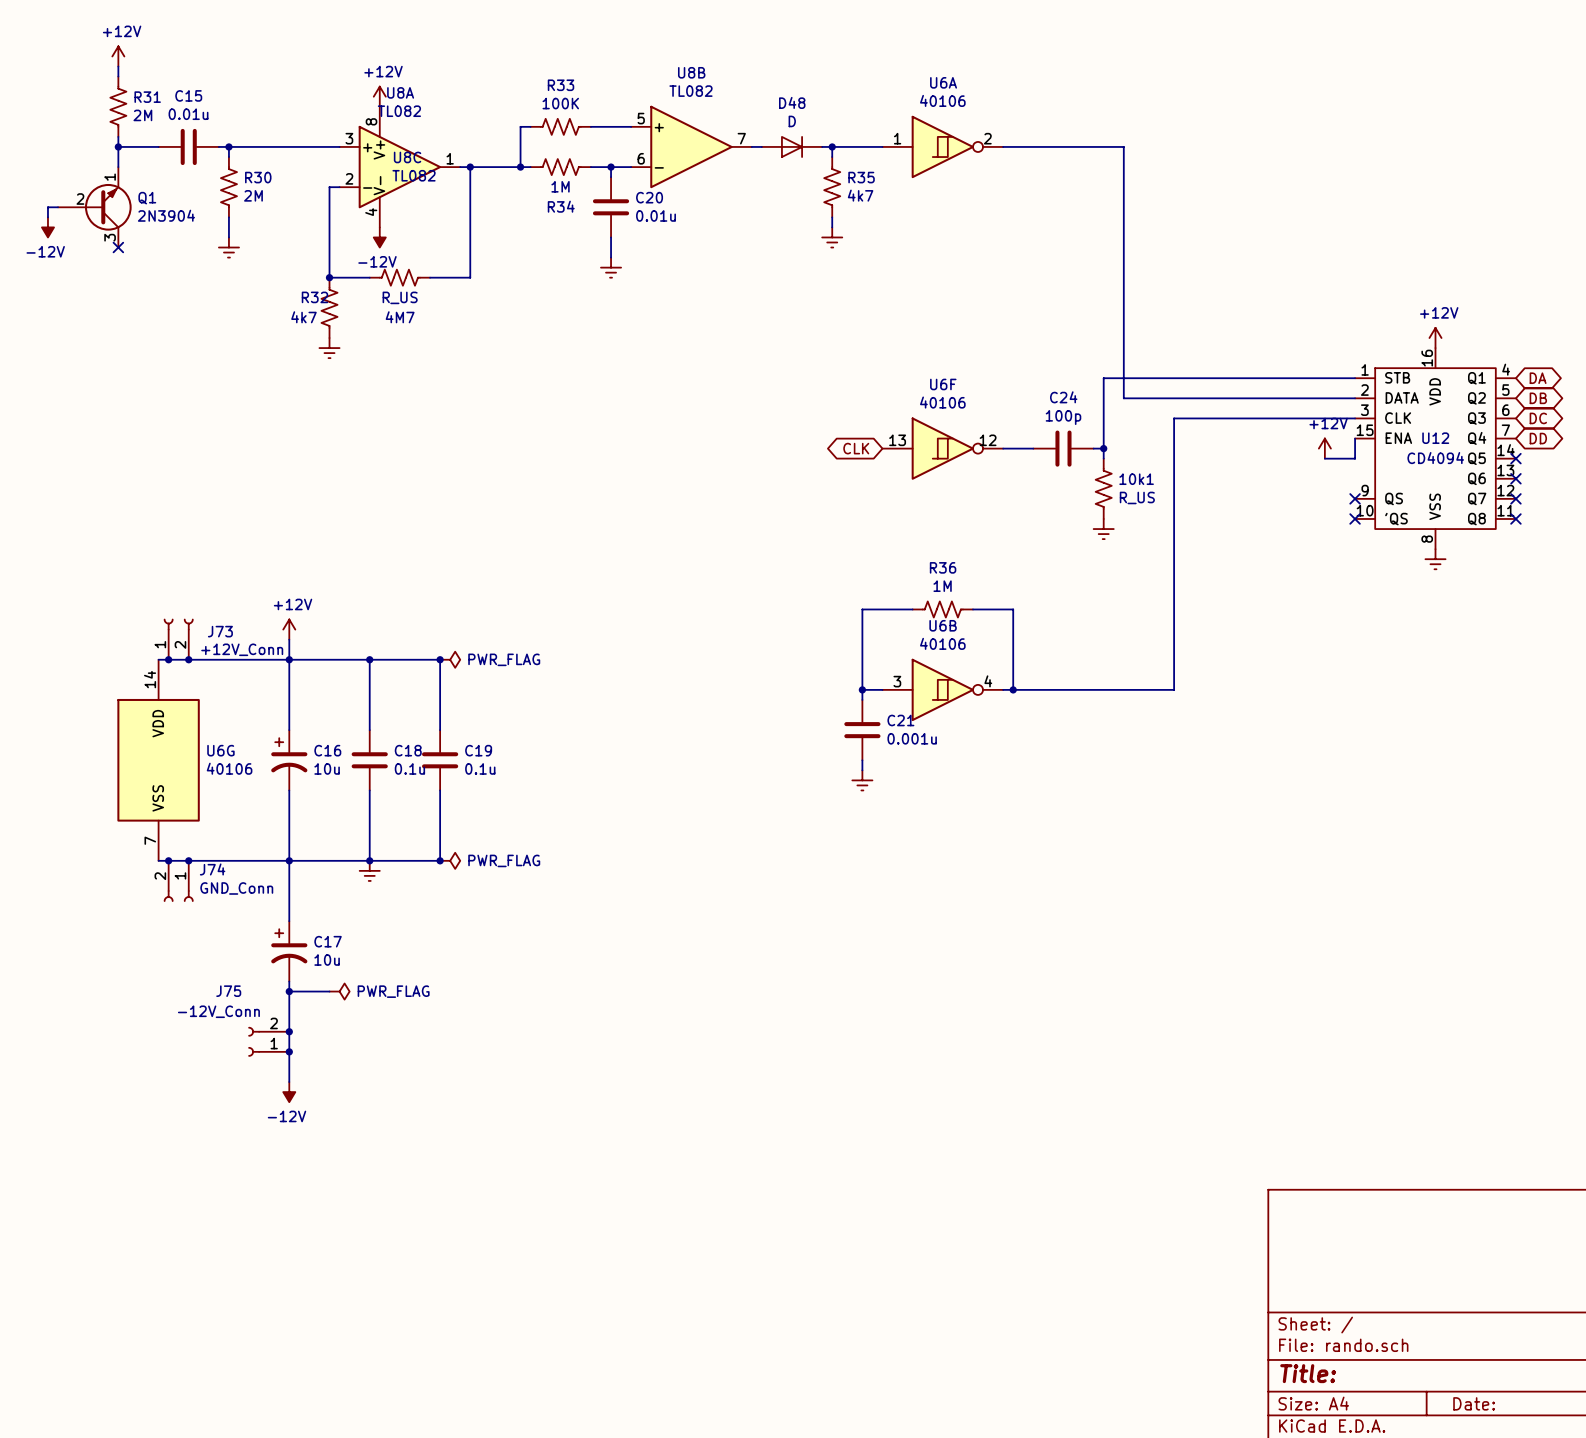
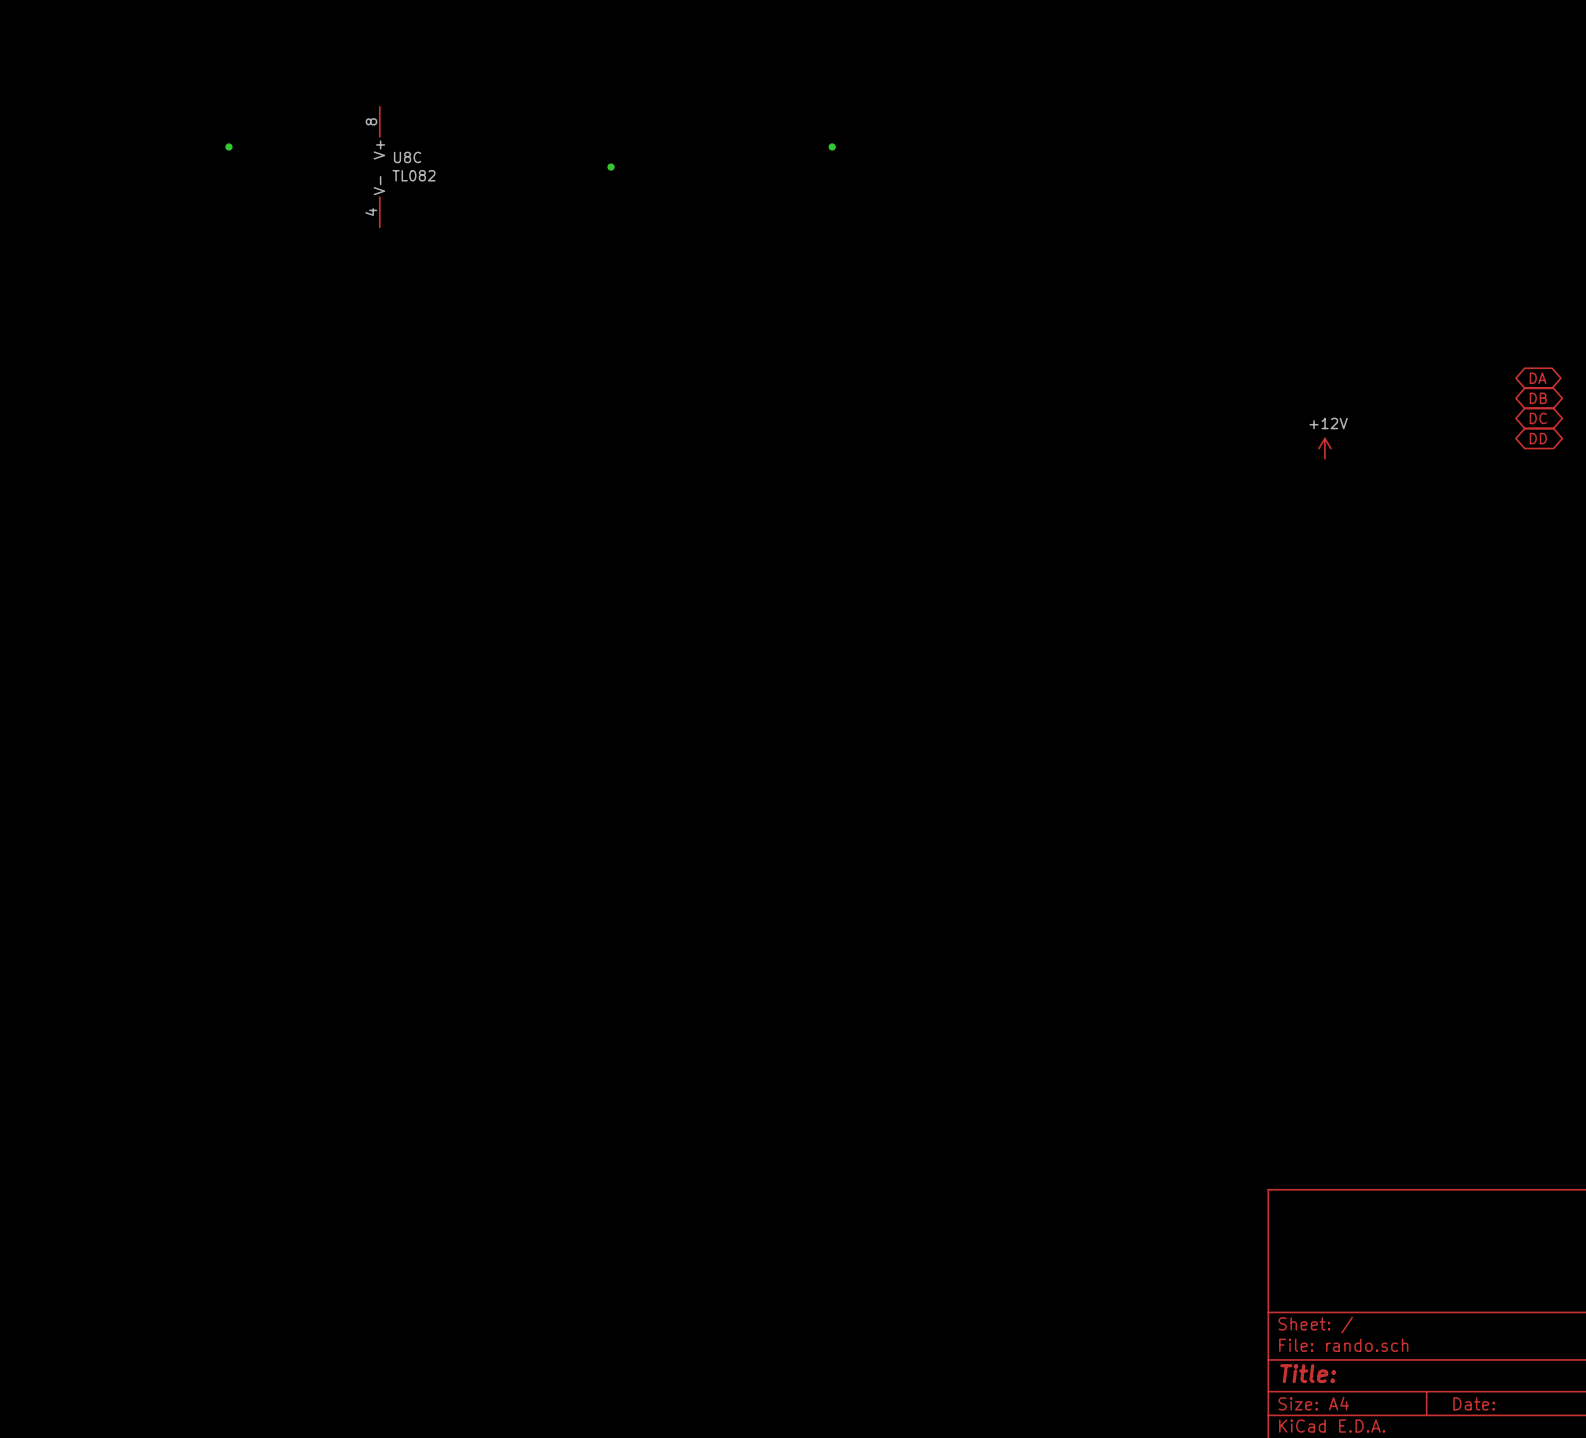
power symbol: +12V (118, 56) -> none
wire: (118, 66) (118, 76) -> none
power symbol: +12V (379, 96) -> none
R31: 2M (118, 106) -> none
wire: (530, 126) (520, 126) (520, 167) -> none
R33: 100K (560, 126) -> none
wire: (590, 126) (631, 126) -> none
wire: (118, 136) (118, 167) -> none
wire: (118, 146) (158, 146) -> none
junction: (118, 146) -> none
C15: 0.01u (188, 146) -> none
wire: (218, 146) (339, 146) -> none
wire: (228, 146) (228, 157) -> none
U8B: TL082 (691, 146) -> none
wire: (751, 146) (761, 146) -> none
D48: D (792, 146) -> none
wire: (822, 146) (882, 146) -> none
wire: (832, 146) (832, 157) -> none
U6A: 40106 (942, 146) -> none
wire: (1003, 146) (1123, 146) (1123, 398) (1355, 398) -> none
U8A: TL082 (399, 167) -> none
wire: (460, 167) (530, 167) -> none
wire: (470, 167) (470, 277) (430, 277) -> none
junction: (470, 167) -> none
junction: (520, 167) -> none
R34: 1M (560, 167) -> none
wire: (590, 167) (631, 167) -> none
wire: (611, 167) (611, 177) -> none
R30: 2M (228, 187) -> none
wire: (339, 187) (329, 187) (329, 277) (369, 277) -> none
R35: 4k7 (832, 187) -> none
wire: (58, 207) (47, 207) (47, 217) -> none
Q1: 2N3904 (94, 207) -> none
C20: 0.01u (611, 207) -> none
wire: (228, 217) (228, 237) -> none
wire: (832, 217) (832, 227) -> none
power symbol: -12V (47, 227) -> none
power symbol: -12V (379, 237) -> none
wire: (611, 237) (611, 257) -> none
power symbol: (832, 237) -> none
no-connect mark: (118, 247) -> none
power symbol: (228, 247) -> none
power symbol: (611, 267) -> none
junction: (329, 277) -> none
4M7: R_US (399, 277) -> none
R32: 4k7 (329, 307) -> none
power symbol: +12V (1435, 338) -> none
power symbol: (329, 348) -> none
wire: (1355, 378) (1103, 378) (1103, 458) -> none
wire: (1355, 418) (1174, 418) (1174, 689) (1003, 689) -> none
wire: (1355, 438) (1355, 458) (1324, 458) -> none
global label: CLK (856, 448) -> none
U6F: 40106 (942, 448) -> none
wire: (1003, 448) (1033, 448) -> none
C24: 100p (1063, 448) -> none
wire: (1093, 448) (1103, 448) -> none
junction: (1103, 448) -> none
U12: CD4094 (1435, 448) -> none
no-connect mark: (1515, 458) -> none
no-connect mark: (1515, 478) -> none
10k1: R_US (1103, 488) -> none
no-connect mark: (1355, 498) -> none
no-connect mark: (1515, 498) -> none
no-connect mark: (1355, 518) -> none
no-connect mark: (1515, 518) -> none
power symbol: (1103, 529) -> none
power symbol: (1435, 559) -> none
wire: (912, 609) (862, 609) (862, 699) -> none
R36: 1M (942, 609) -> none
wire: (972, 609) (1013, 609) (1013, 689) -> none
power symbol: +12V (289, 629) -> none
J73: +12V_Conn (178, 639) -> none
wire: (289, 639) (289, 730) -> none
wire: (158, 659) (440, 659) (440, 730) -> none
junction: (168, 659) -> none
junction: (188, 659) -> none
junction: (289, 659) -> none
wire: (369, 659) (369, 730) -> none
junction: (369, 659) -> none
junction: (440, 659) -> none
power symbol: PWR_FLAG (450, 659) -> none
wire: (862, 689) (882, 689) -> none
junction: (862, 689) -> none
U6B: 40106 (942, 689) -> none
junction: (1013, 689) -> none
C21: 0.001u (862, 730) -> none
U6G: 40106 (158, 760) -> none
C16: 10u (289, 760) -> none
C18: 0.1u (369, 760) -> none
C19: 0.1u (440, 760) -> none
wire: (862, 760) (862, 770) -> none
power symbol: (862, 780) -> none
wire: (289, 790) (289, 921) -> none
wire: (369, 790) (369, 860) -> none
wire: (440, 790) (440, 860) (158, 860) -> none
junction: (168, 860) -> none
junction: (188, 860) -> none
junction: (289, 860) -> none
junction: (369, 860) -> none
junction: (440, 860) -> none
power symbol: PWR_FLAG (450, 860) -> none
power symbol: (369, 870) -> none
J74: GND_Conn (178, 881) -> none
C17: 10u (289, 951) -> none
wire: (289, 981) (289, 1082) -> none
wire: (289, 991) (329, 991) -> none
junction: (289, 991) -> none
power symbol: PWR_FLAG (339, 991) -> none
junction: (289, 1031) -> none
J75: -12V_Conn (268, 1041) -> none
junction: (289, 1051) -> none
power symbol: -12V (289, 1092) -> none

